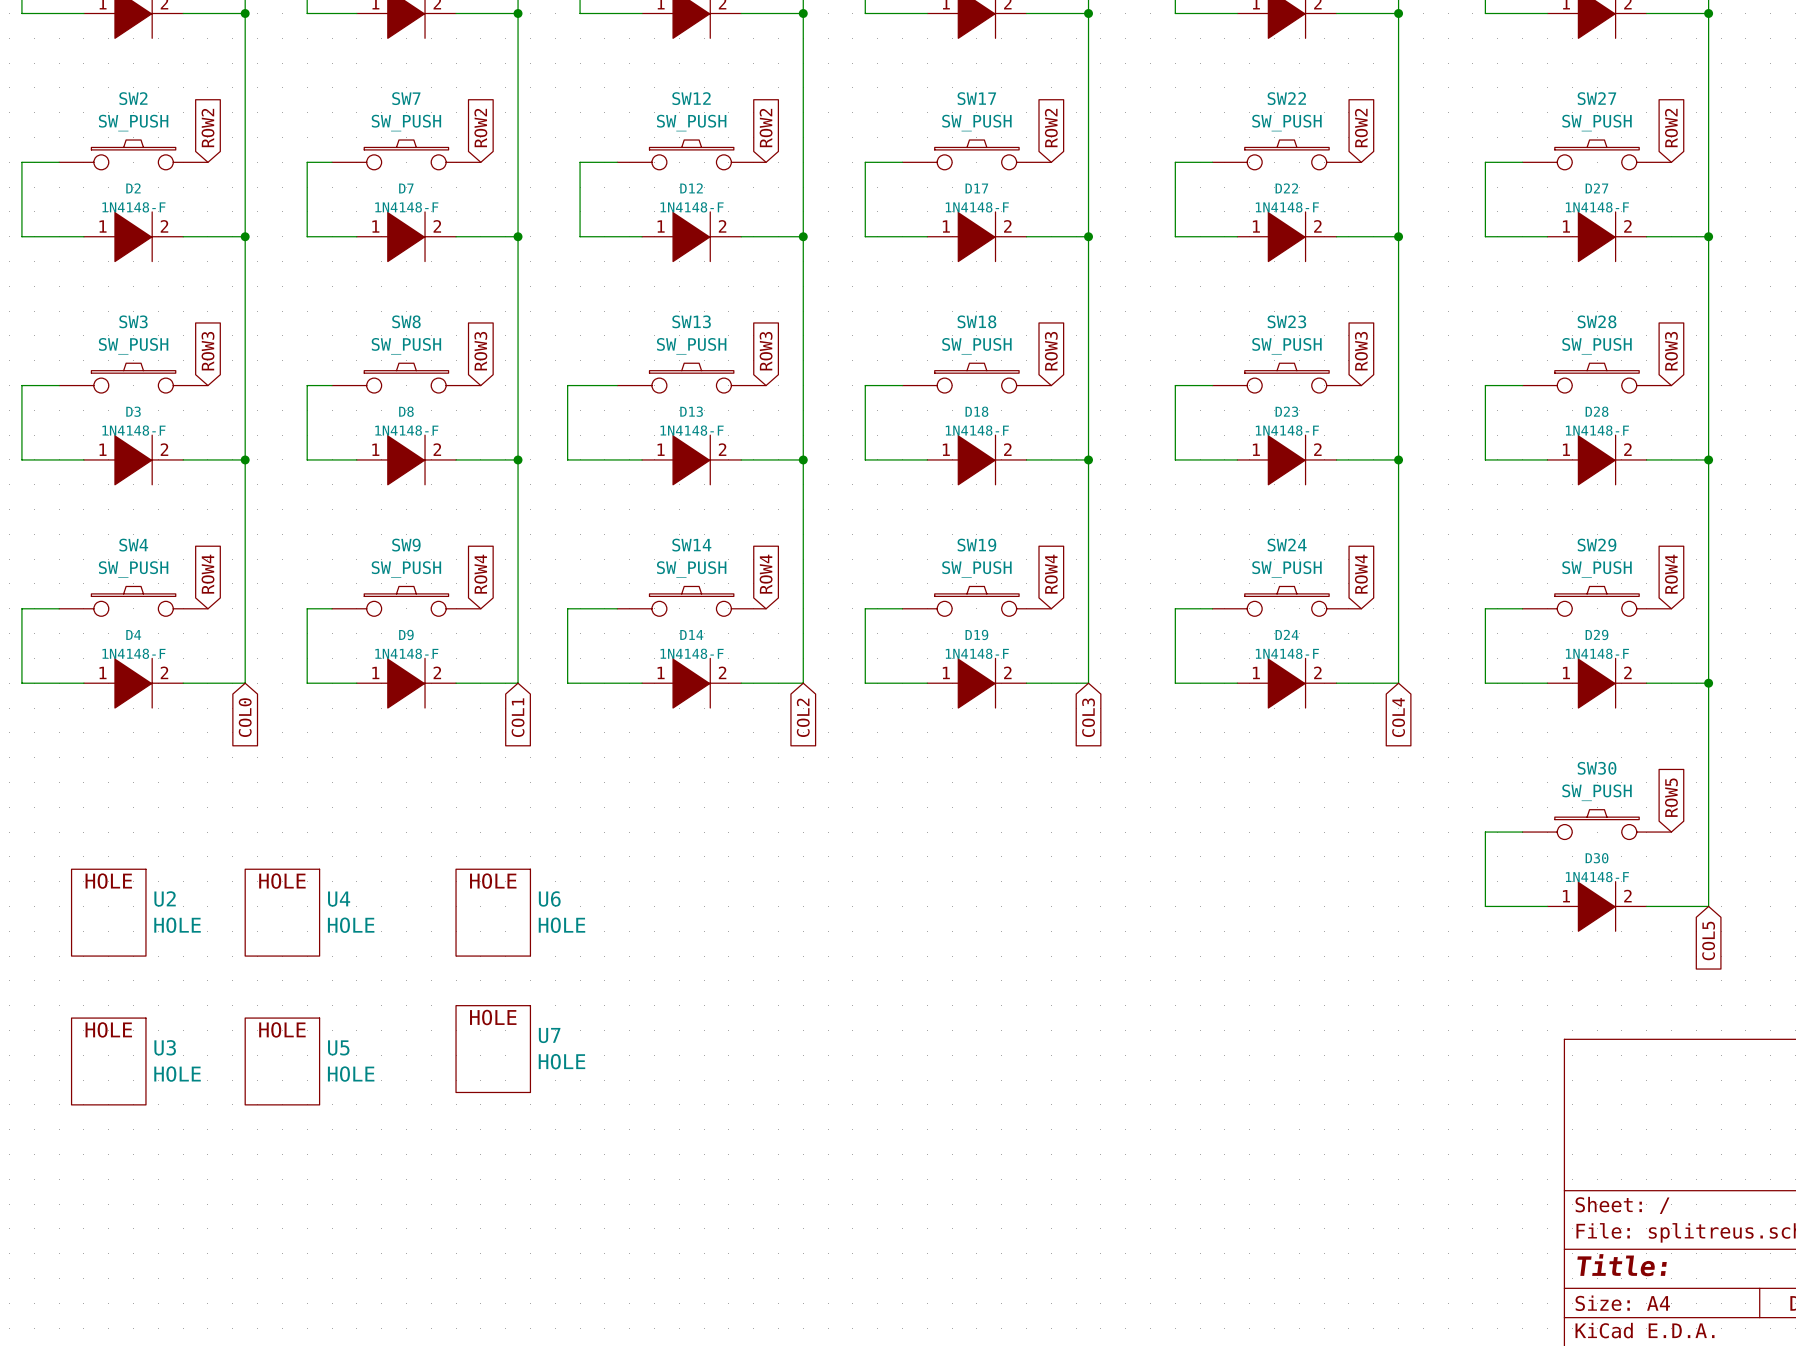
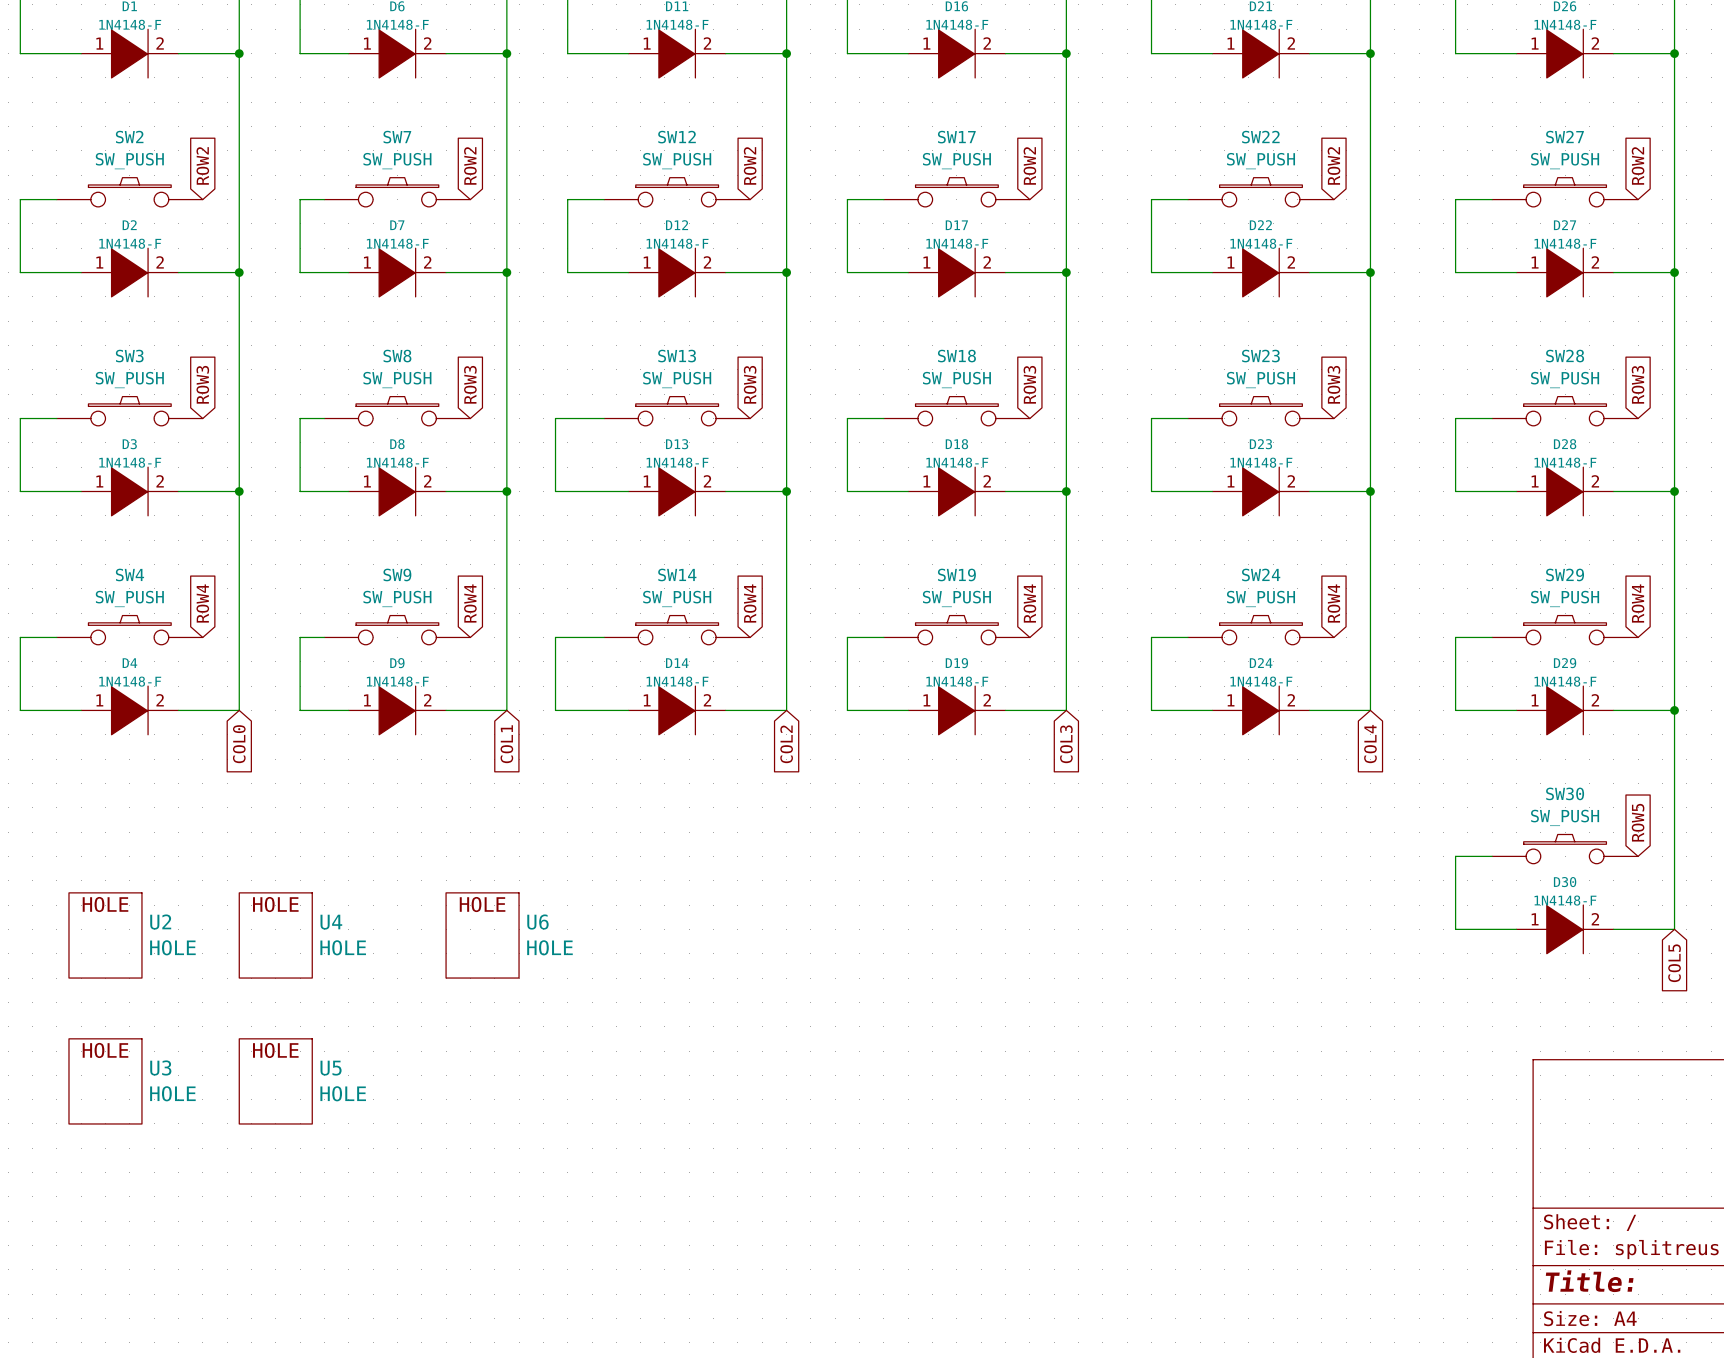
U7: HOLE (493, 1049) -> none

